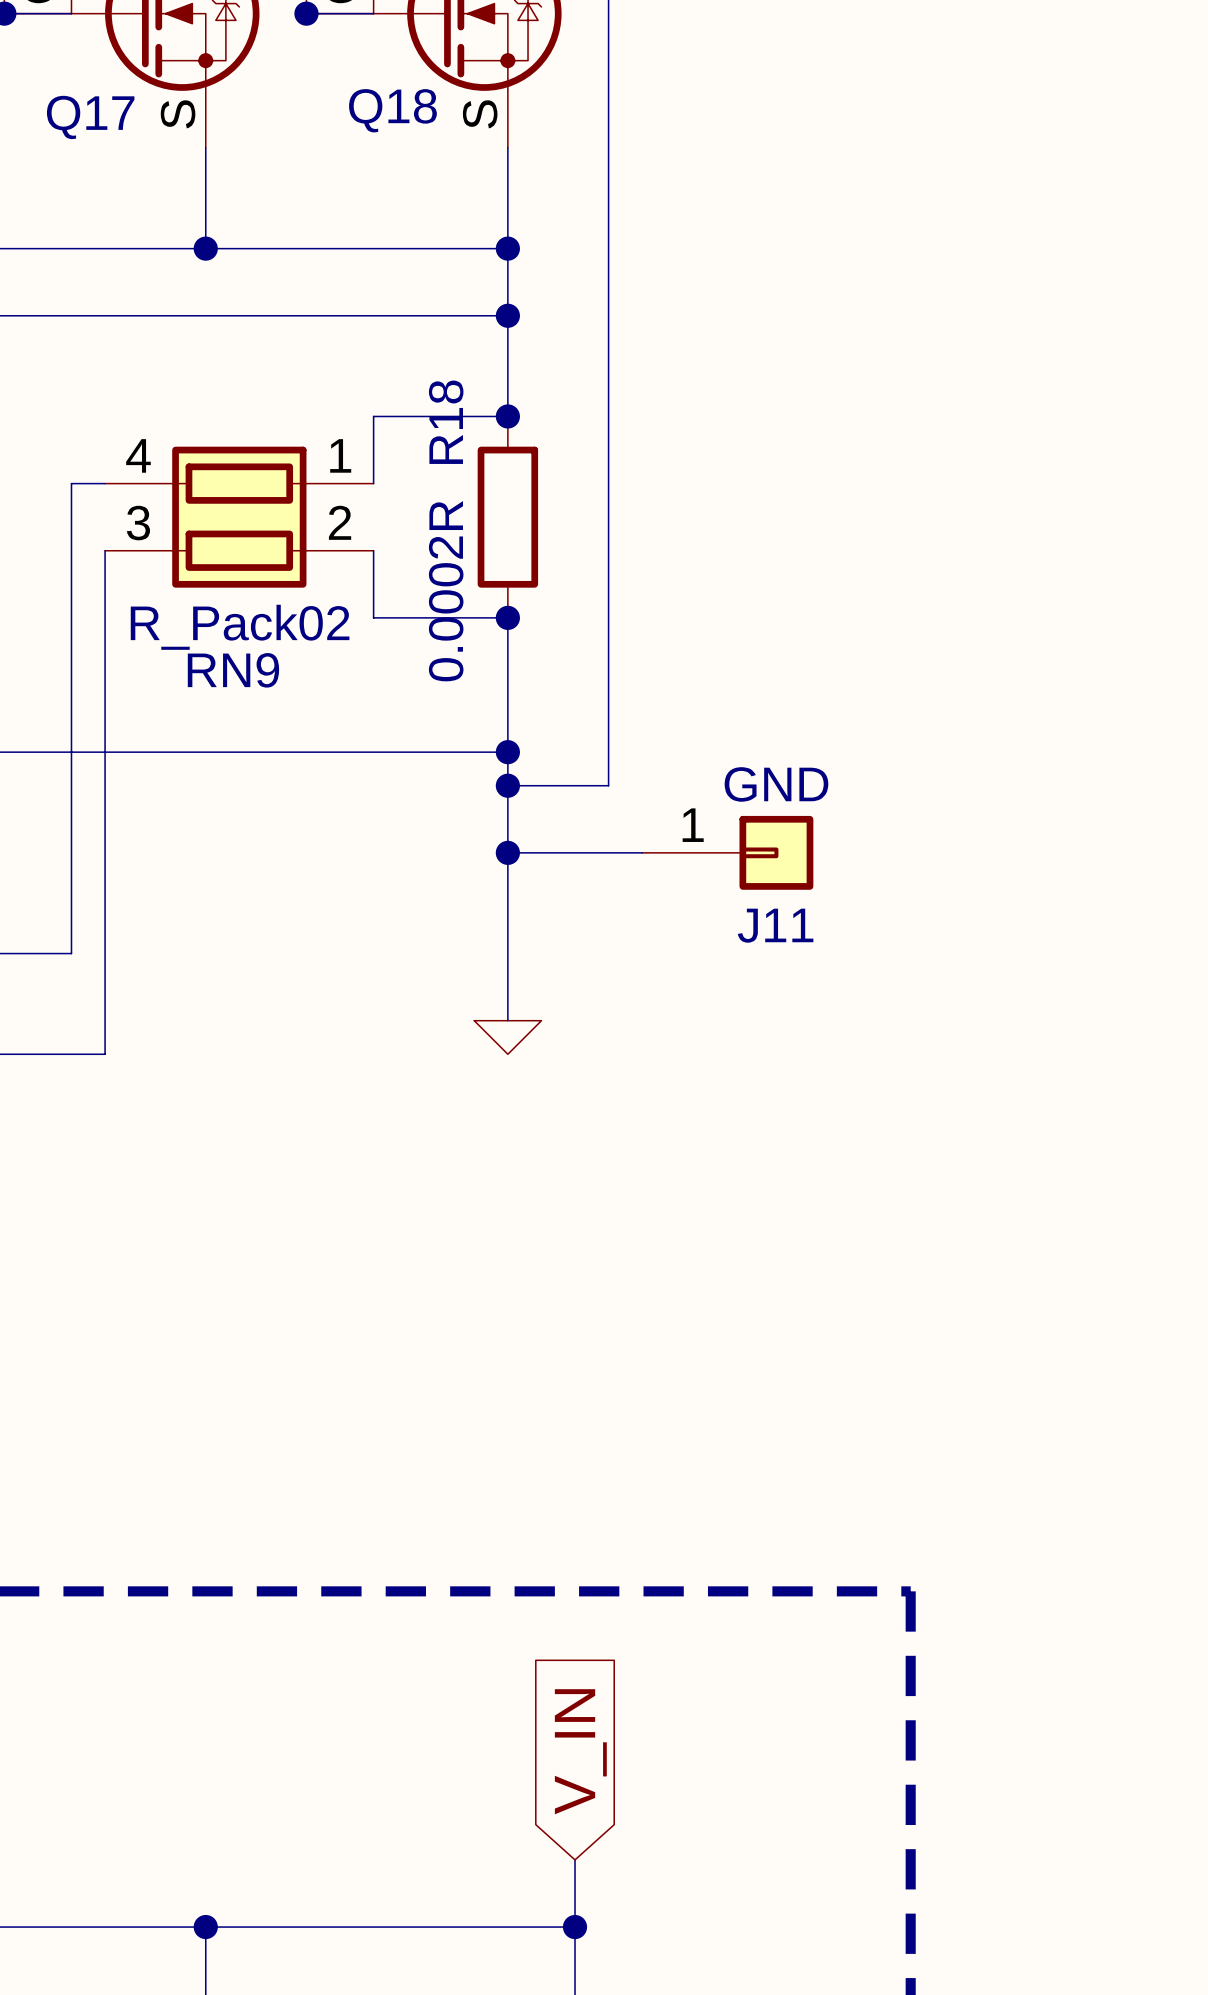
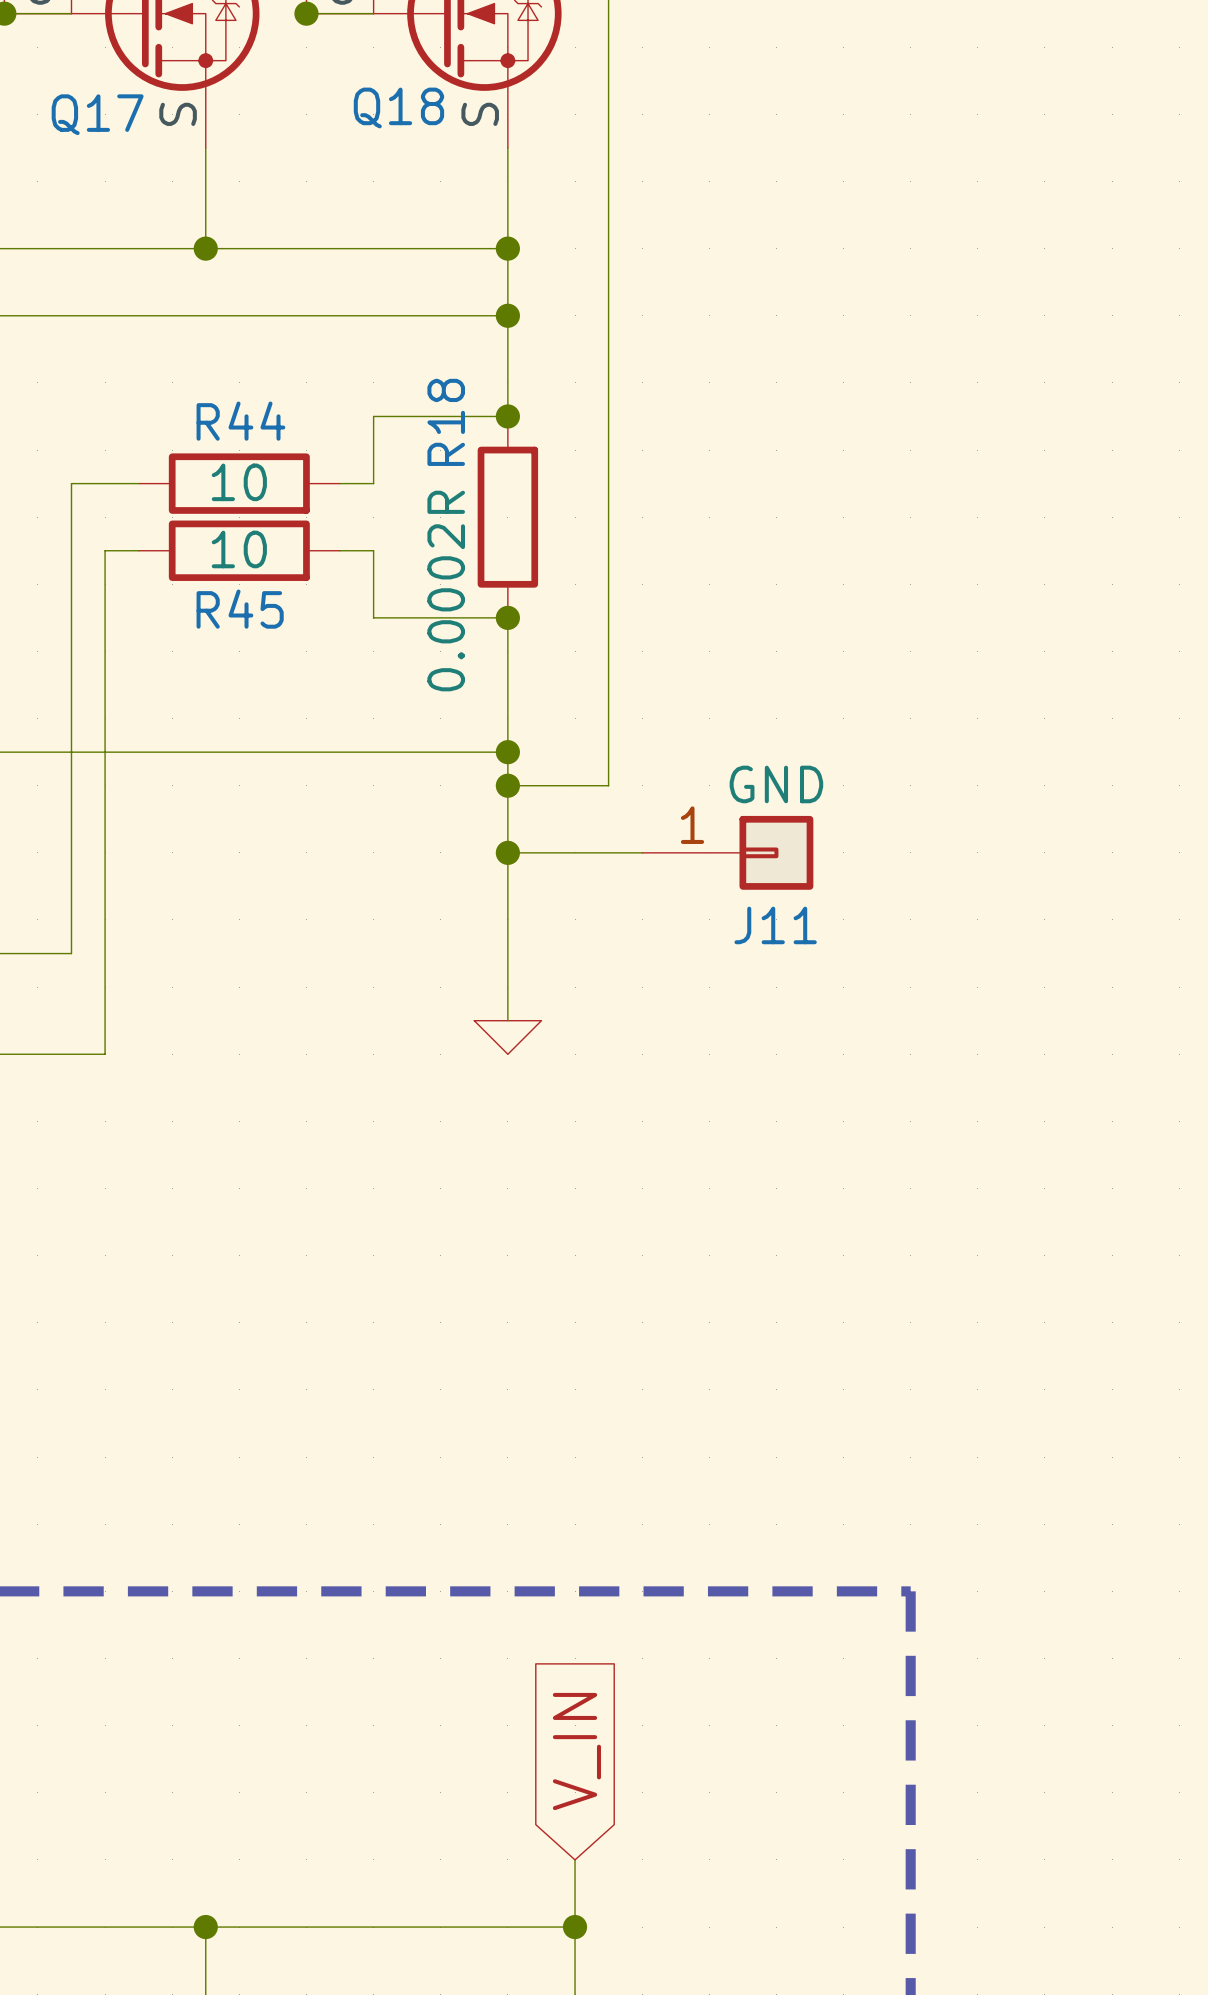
R44: none -> 10 (239, 483)
RN9: R_Pack02 (239, 517) -> none
R45: none -> 10 (239, 550)

